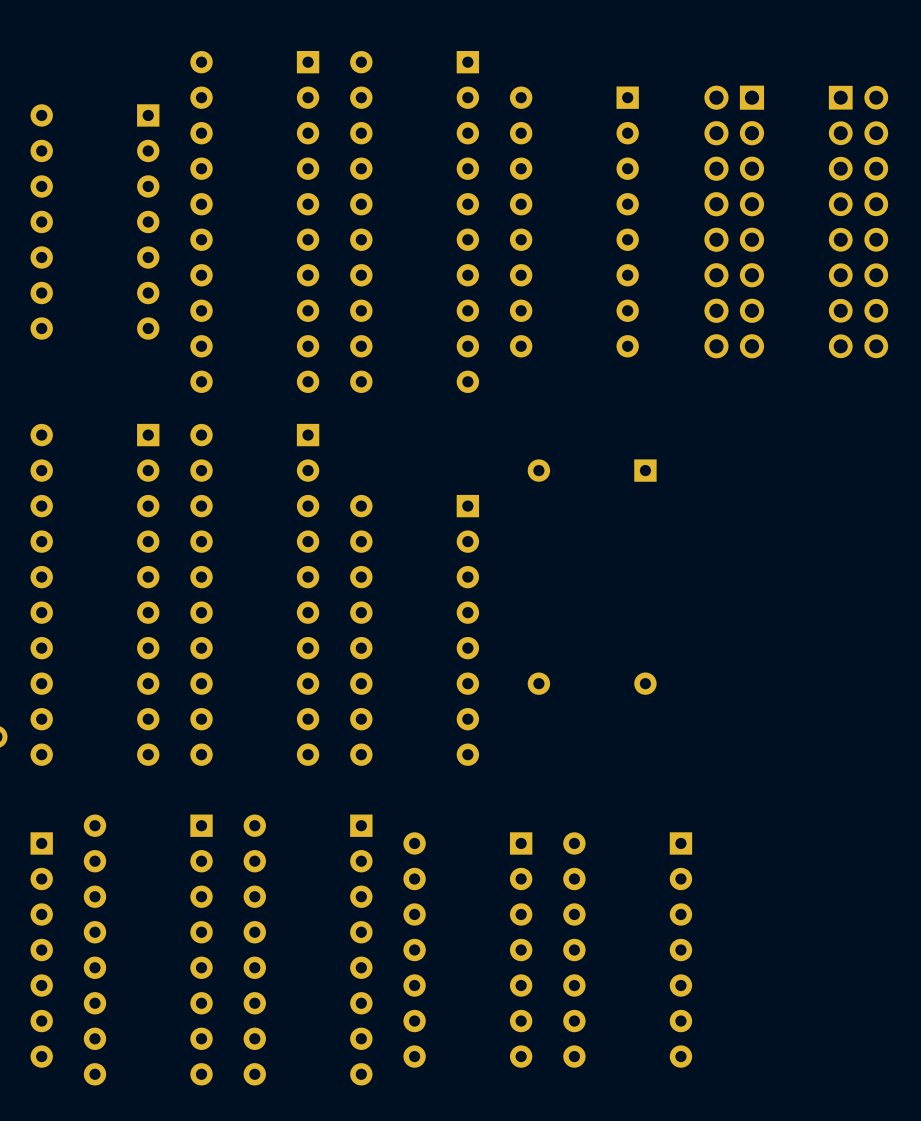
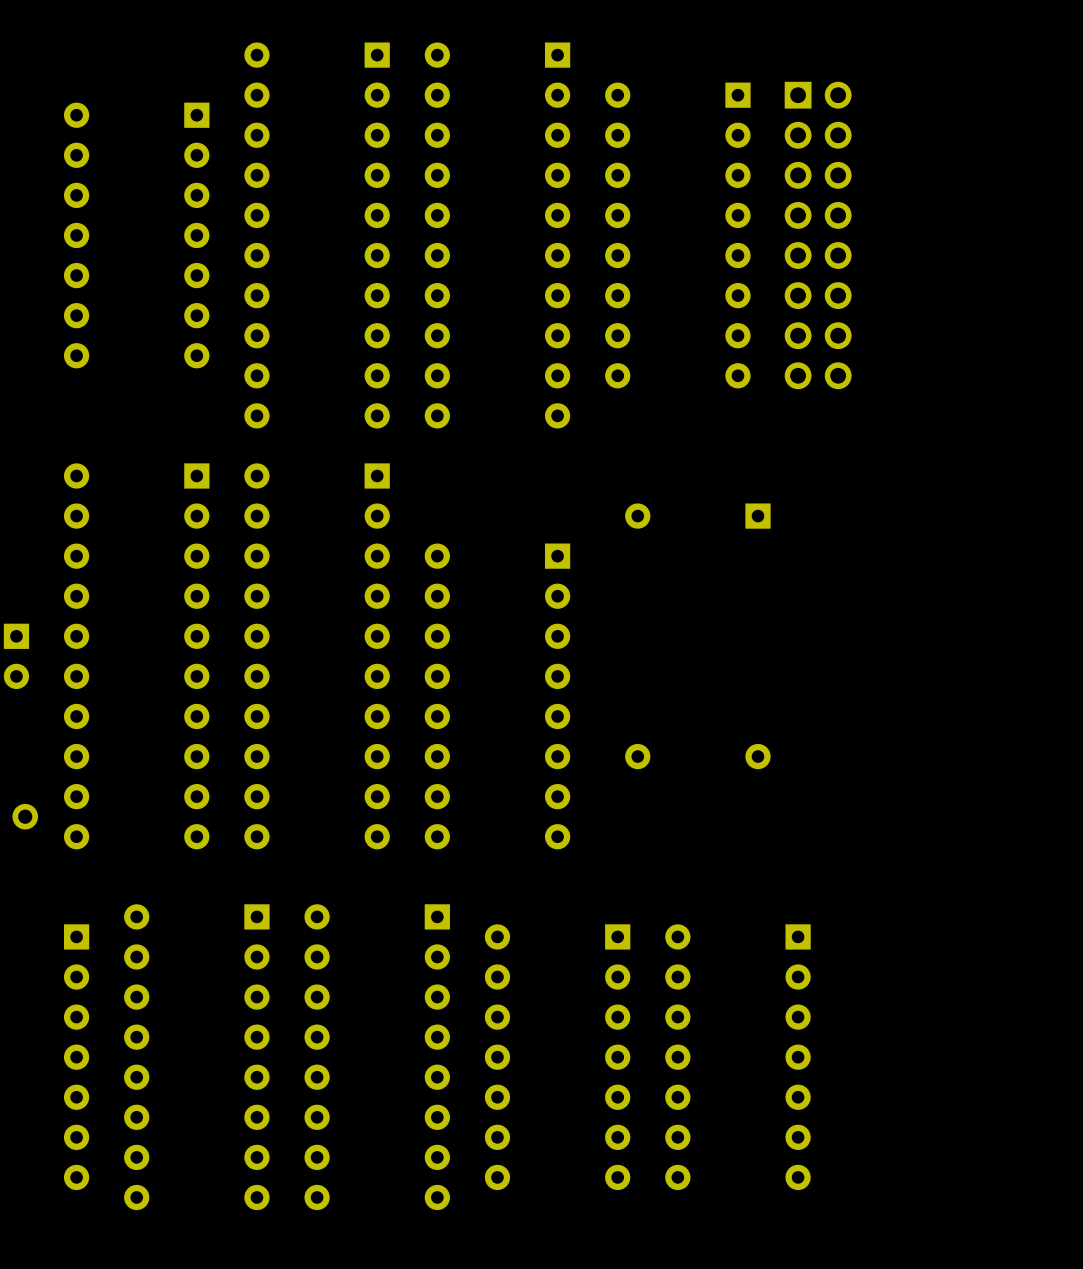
part: (734, 221) -> none
part position: (858, 221) -> (818, 235)

